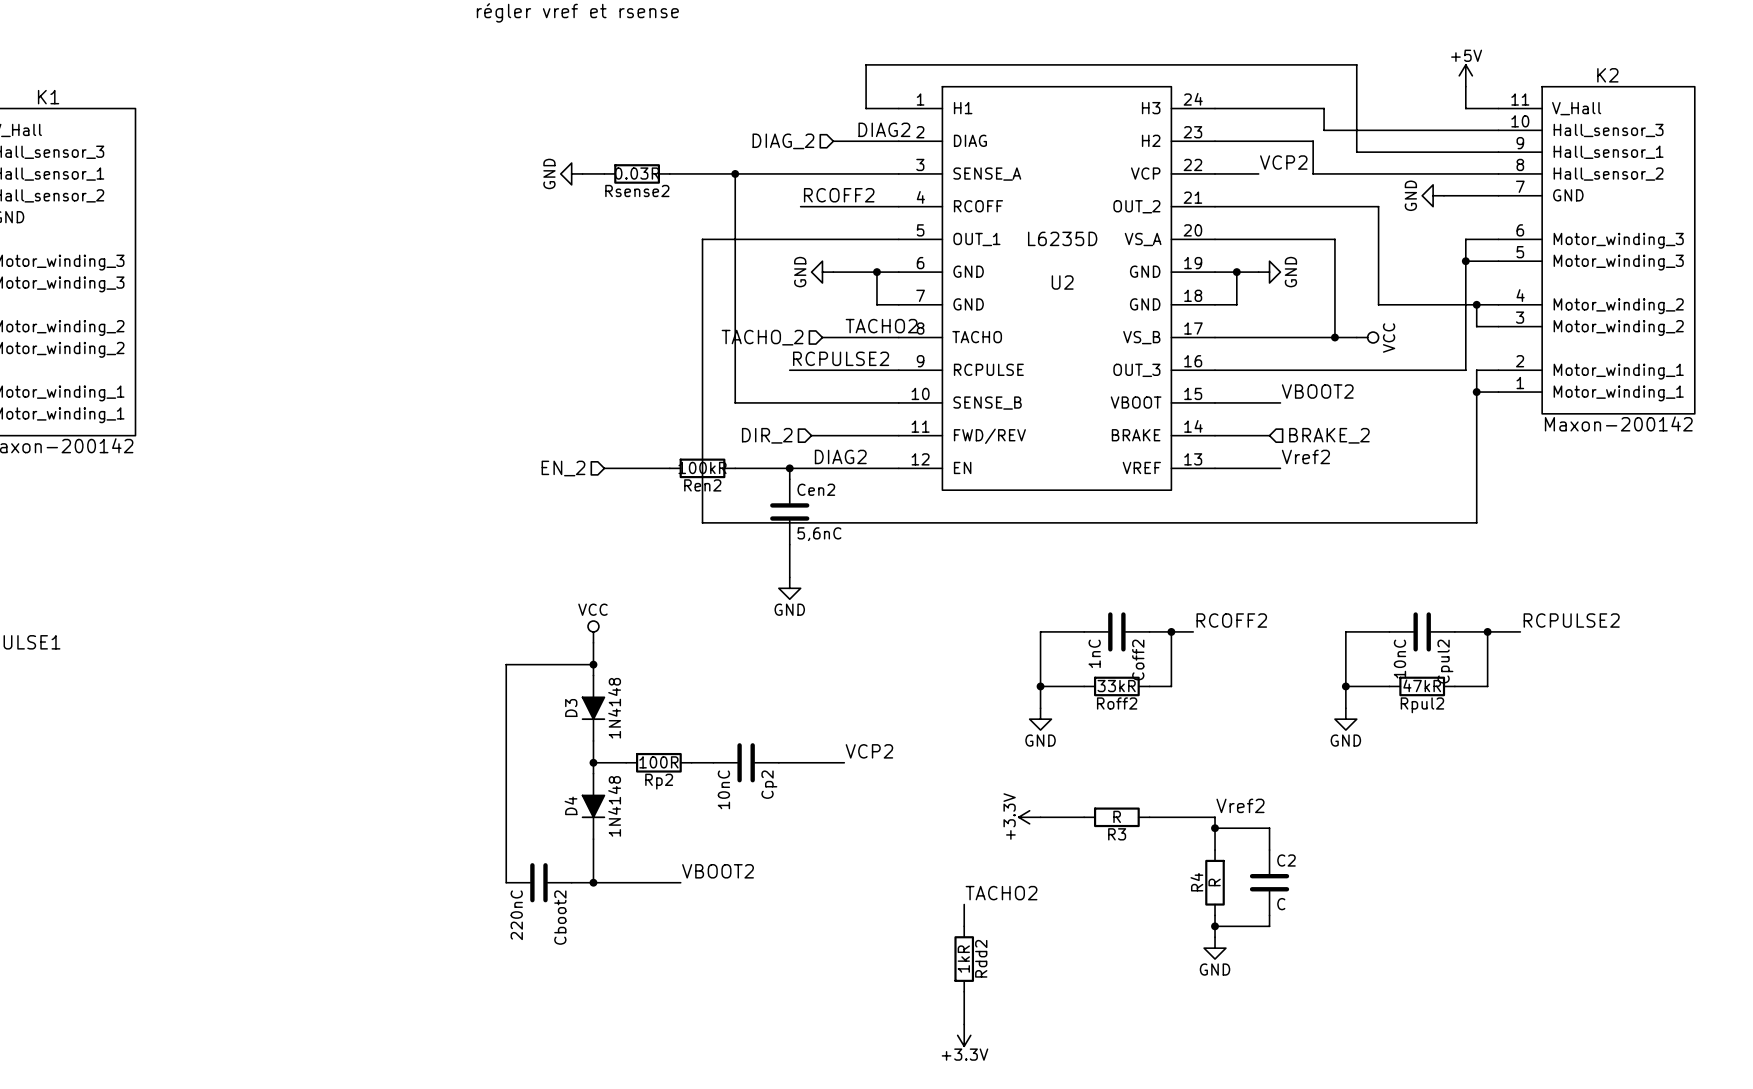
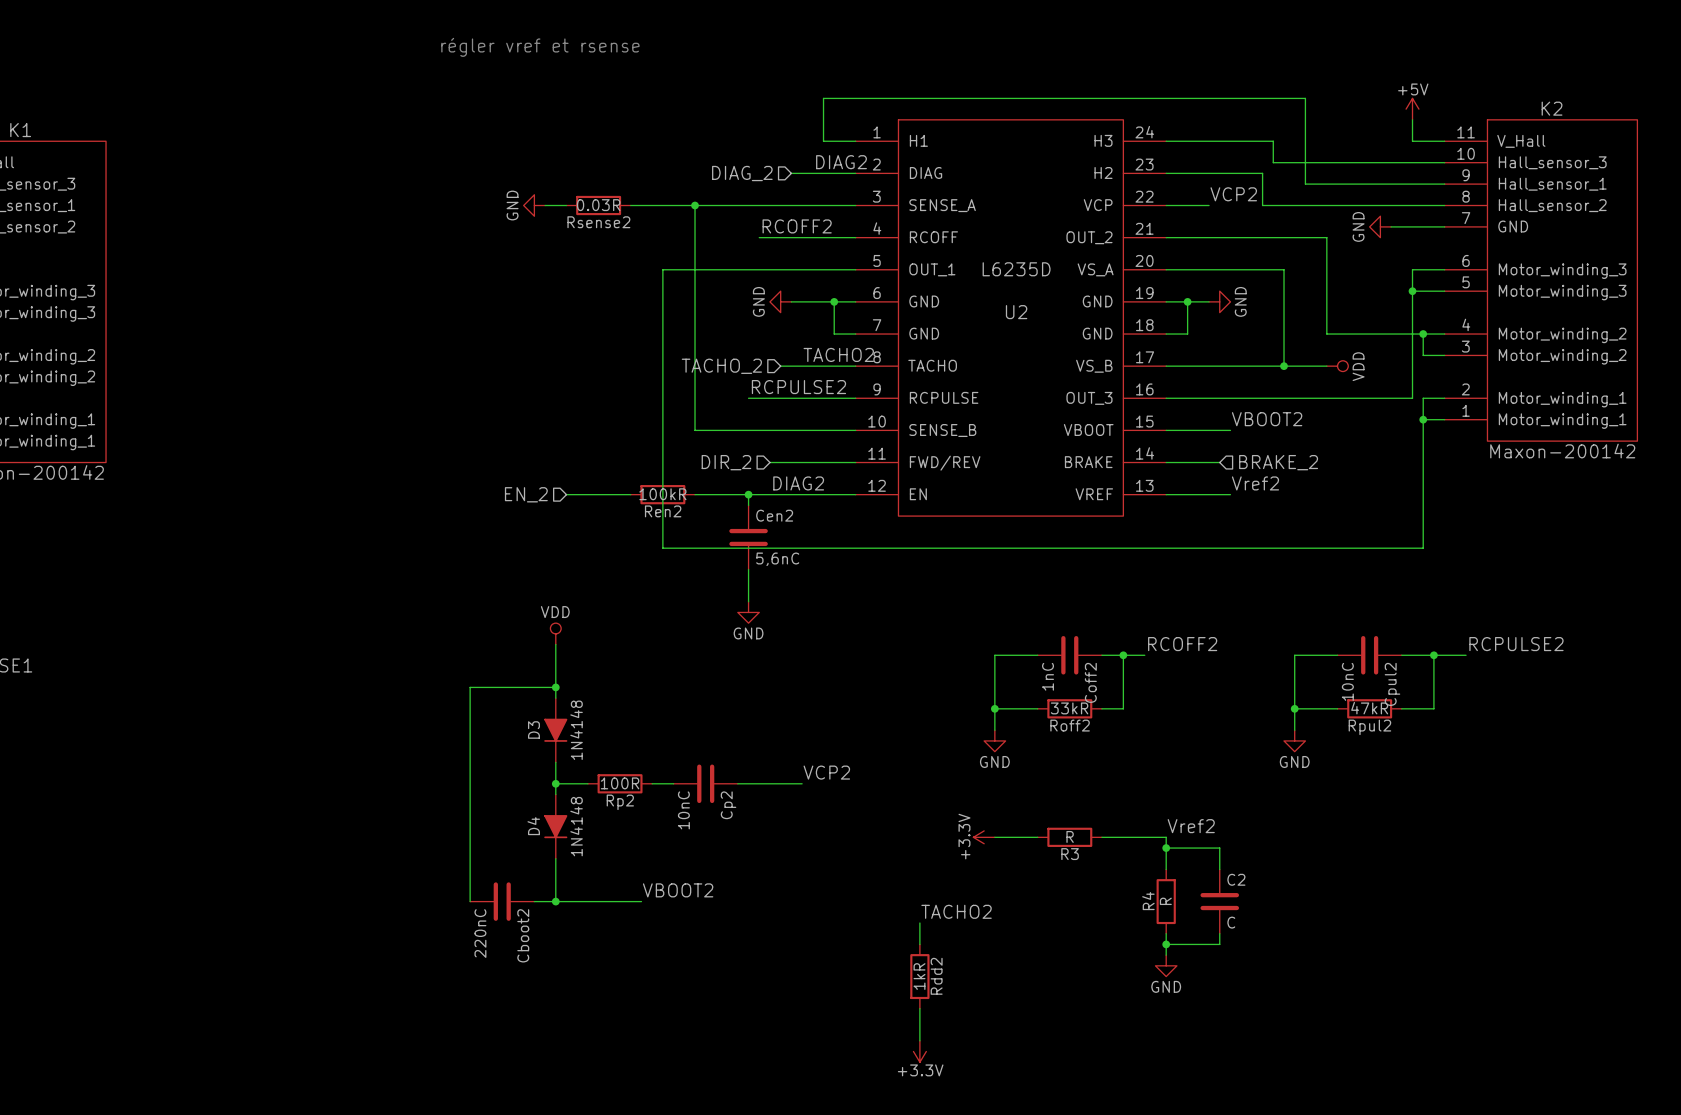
power symbol: VCC (1367, 337) -> none
power symbol: none -> VDD (1337, 366)
power symbol: none -> VDD (555, 633)
power symbol: VCC (593, 631) -> none

